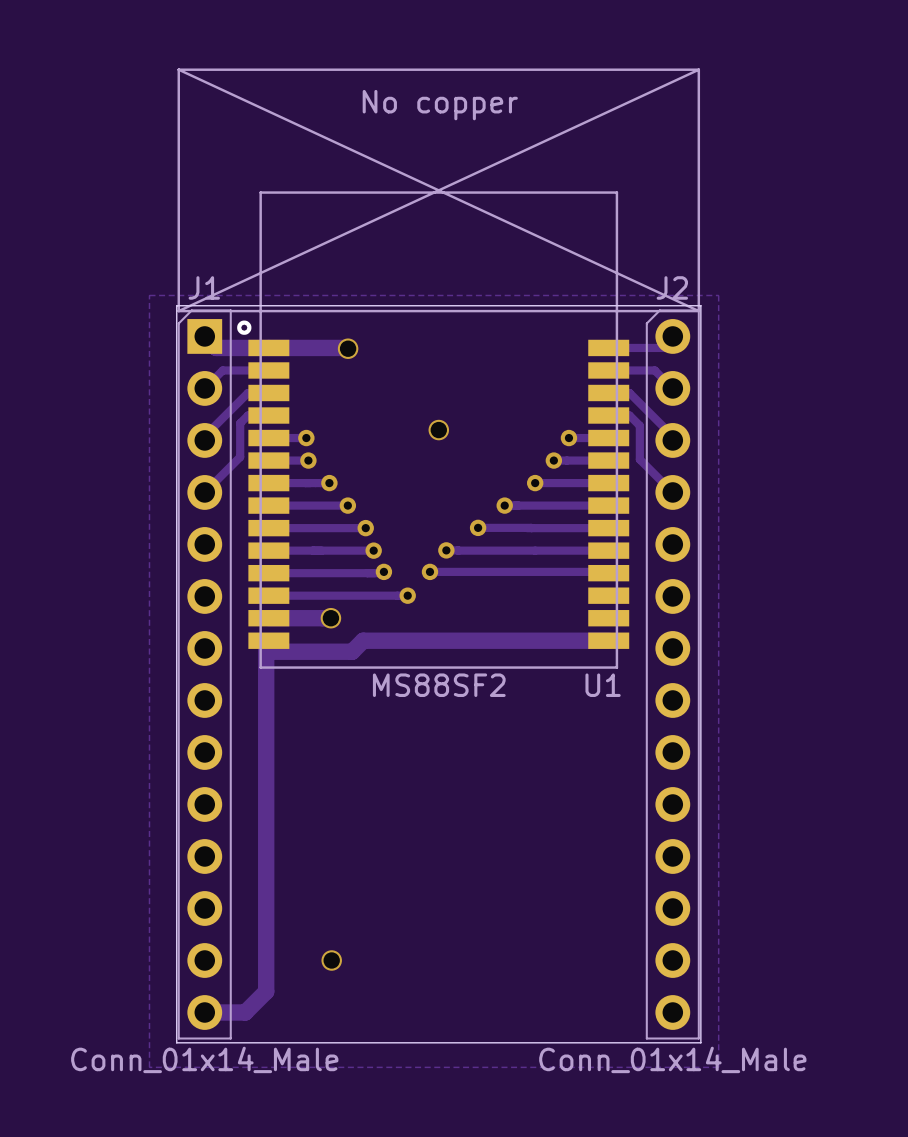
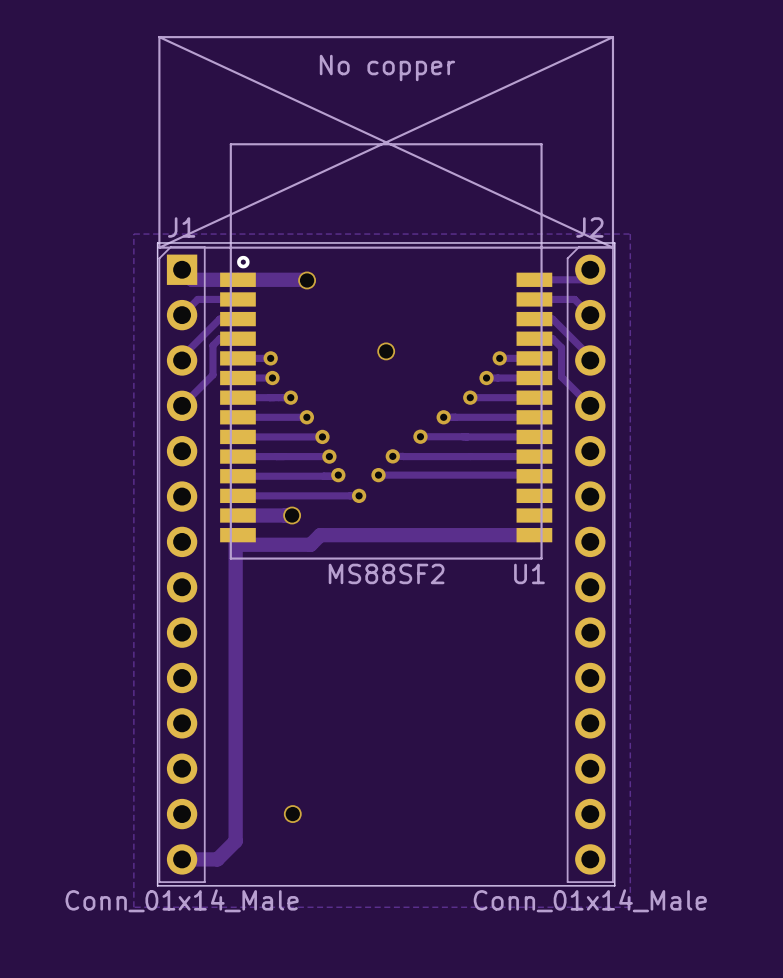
U1 footprint: [177, 68, 701, 669] -> [158, 36, 615, 560]

